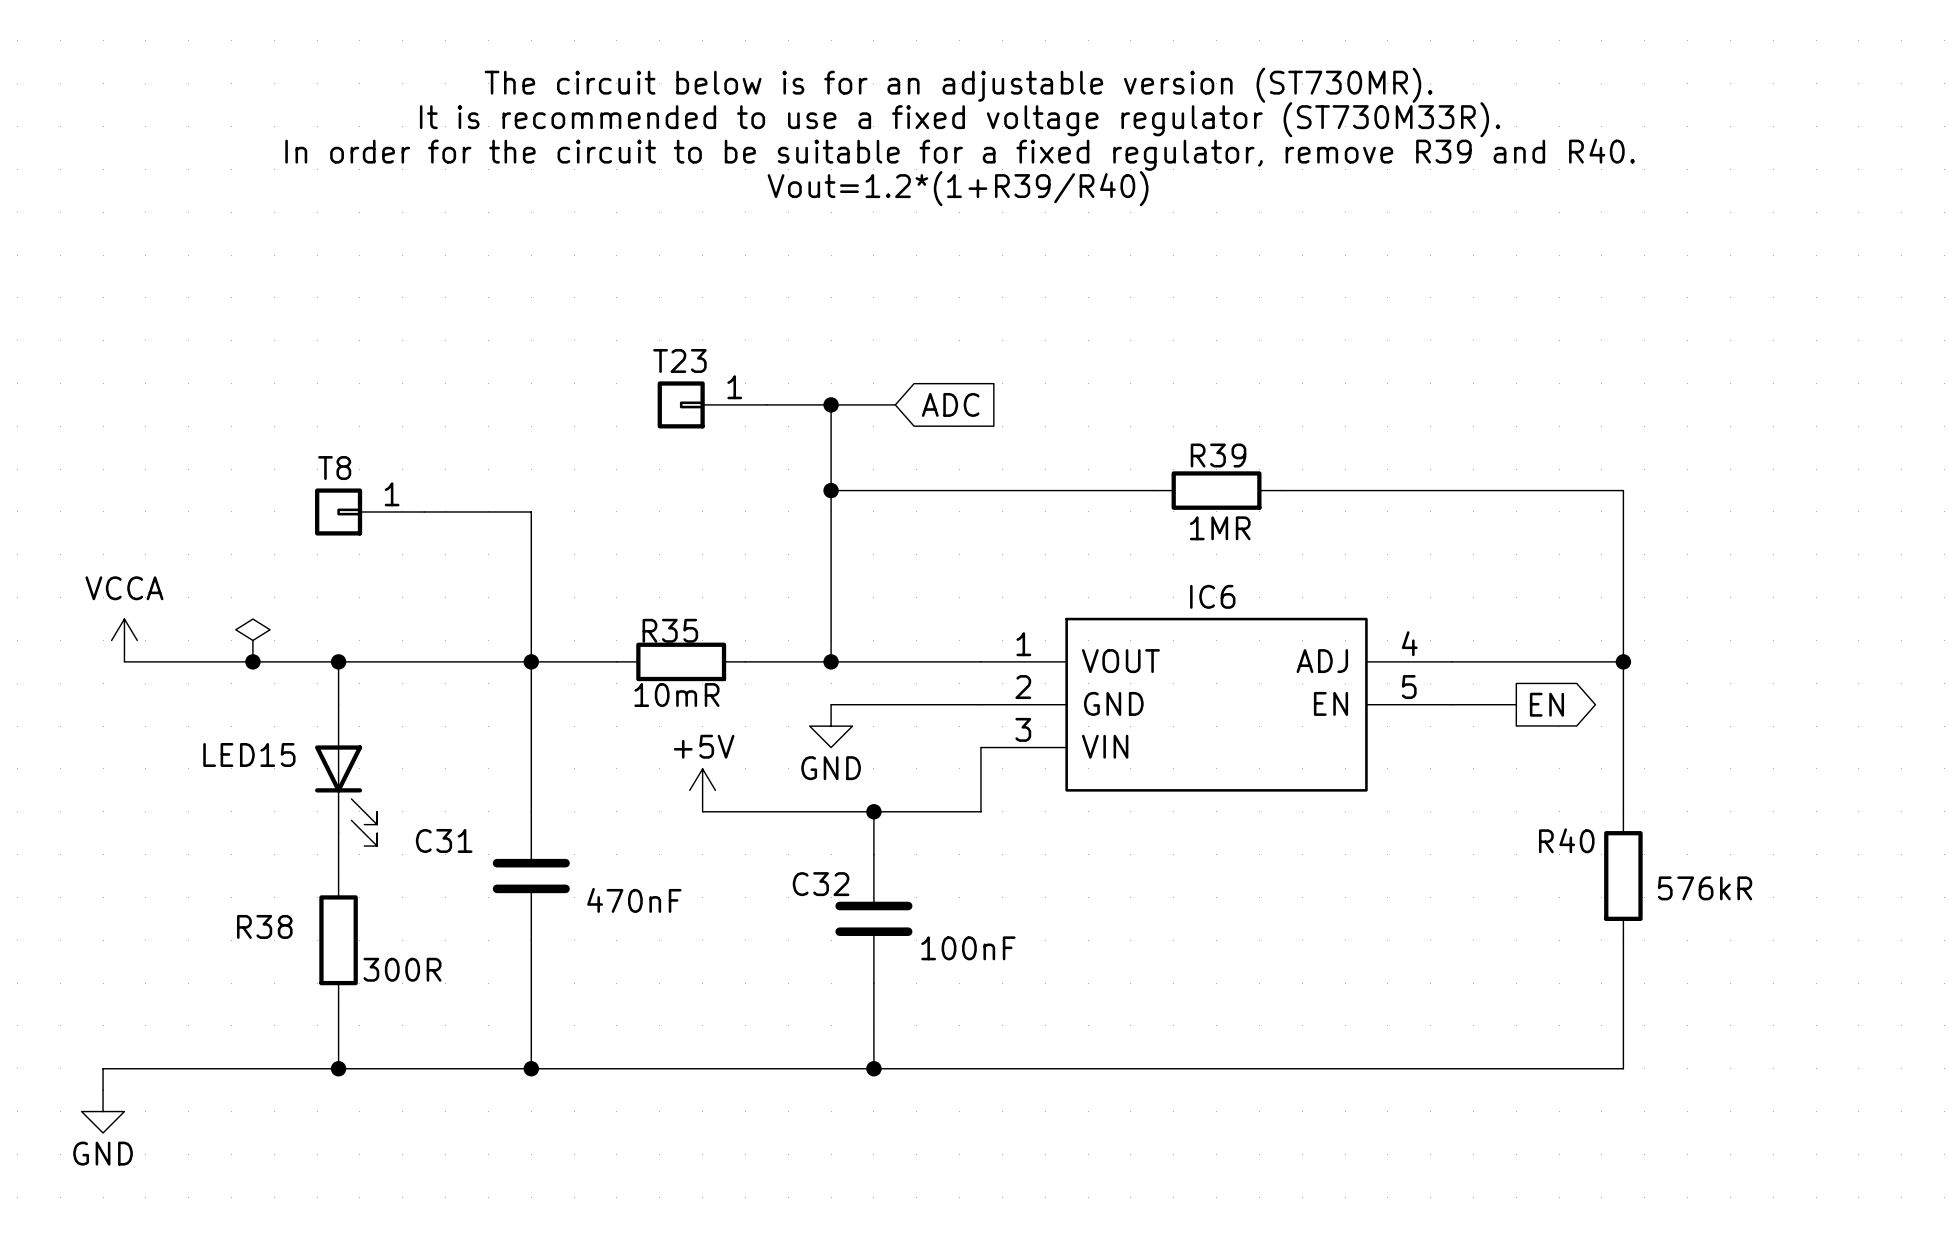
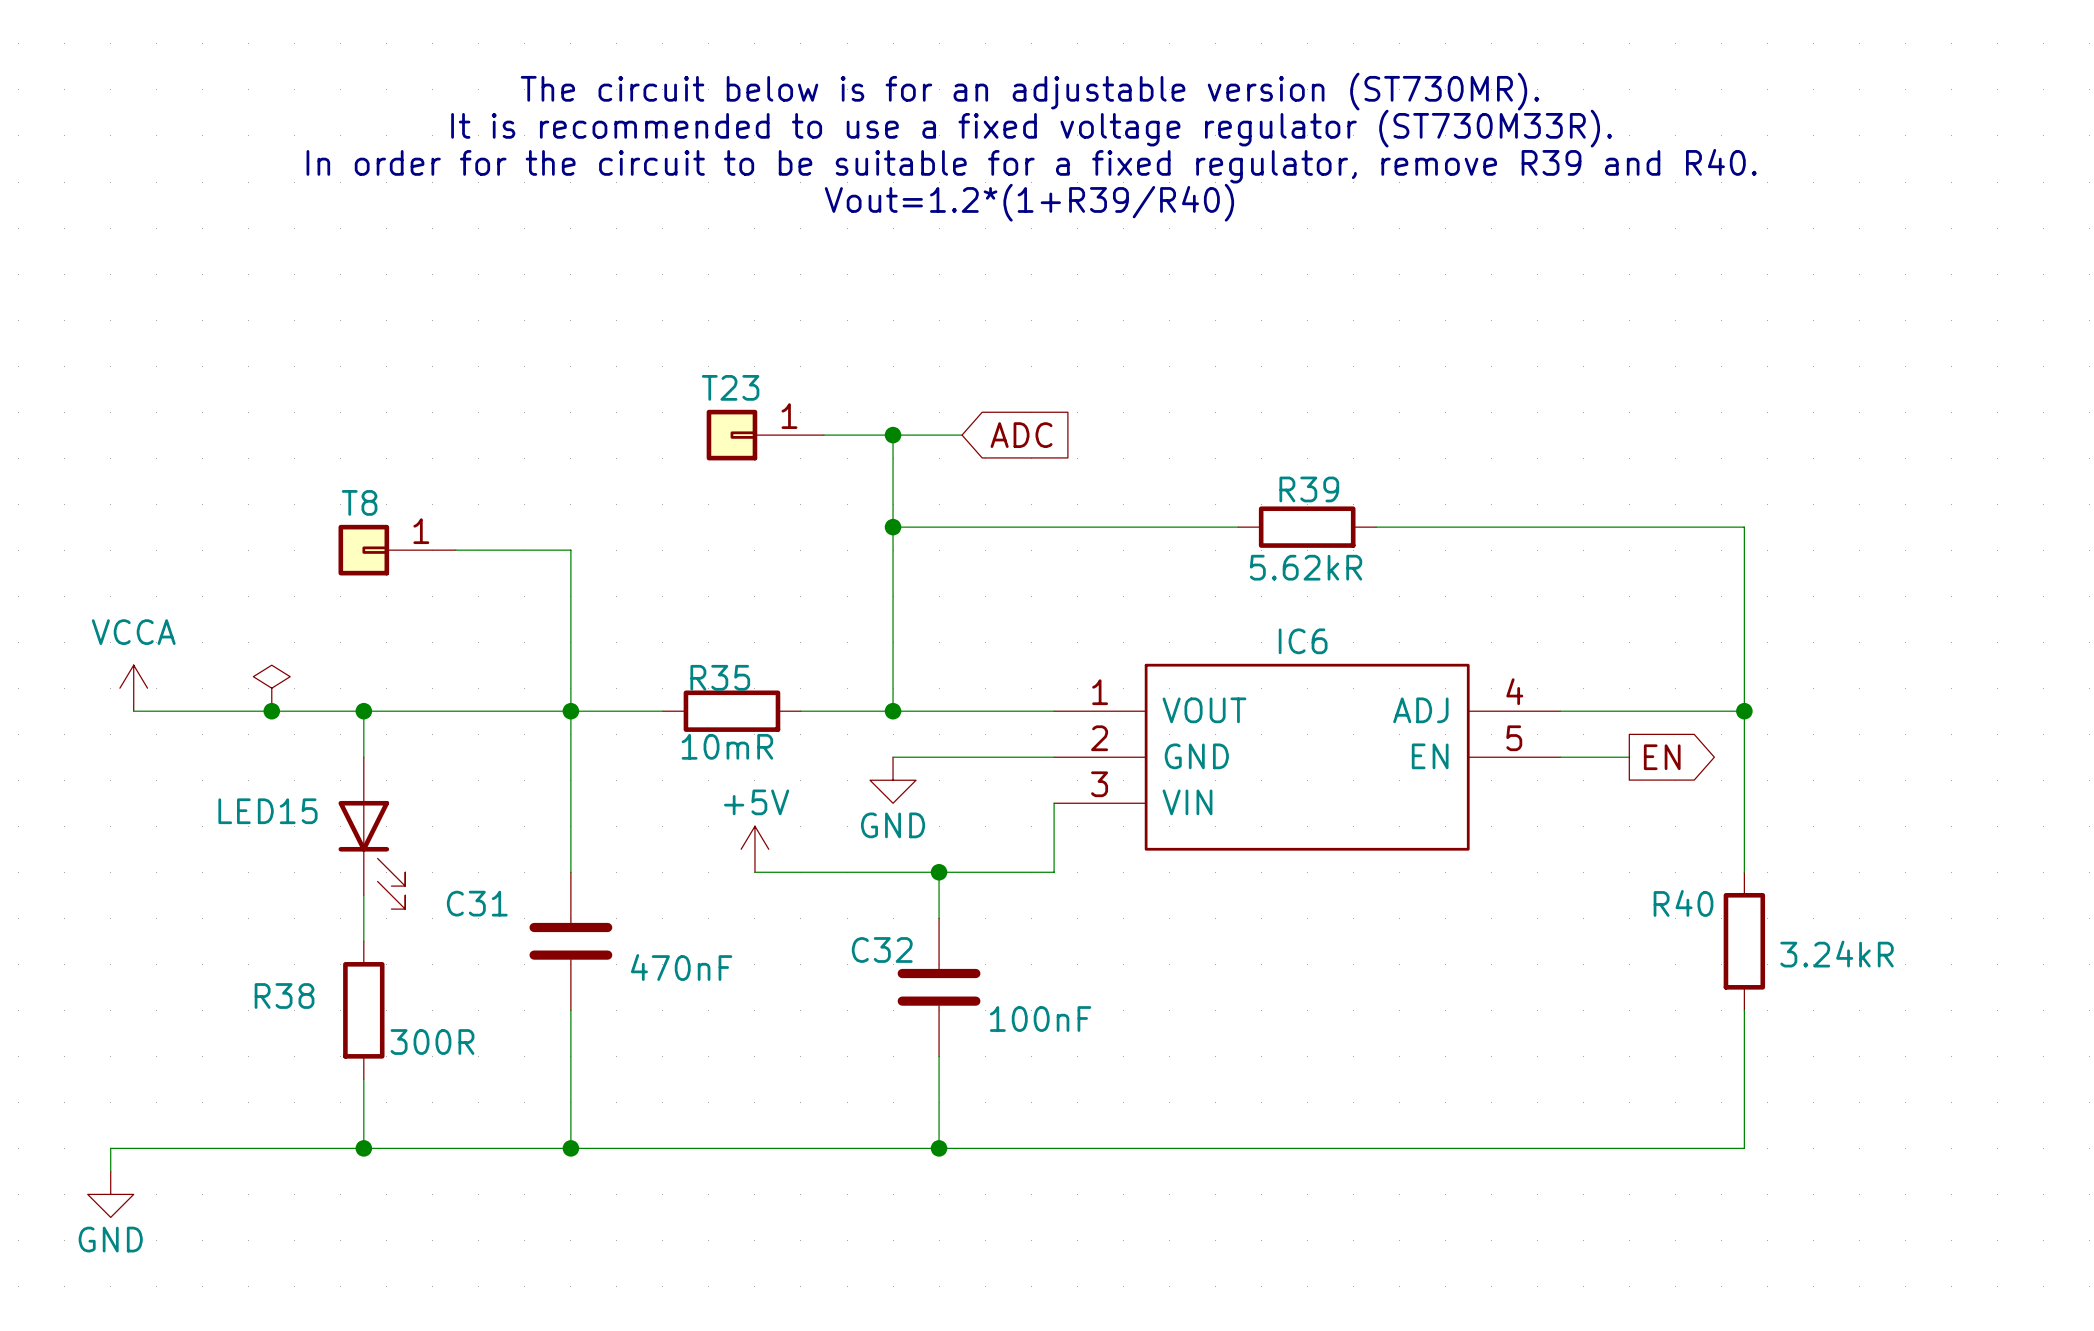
R39 value: 1MR (1220, 528) -> 5.62kR (1306, 567)
R40 value: 576kR (1705, 888) -> 3.24kR (1837, 954)

